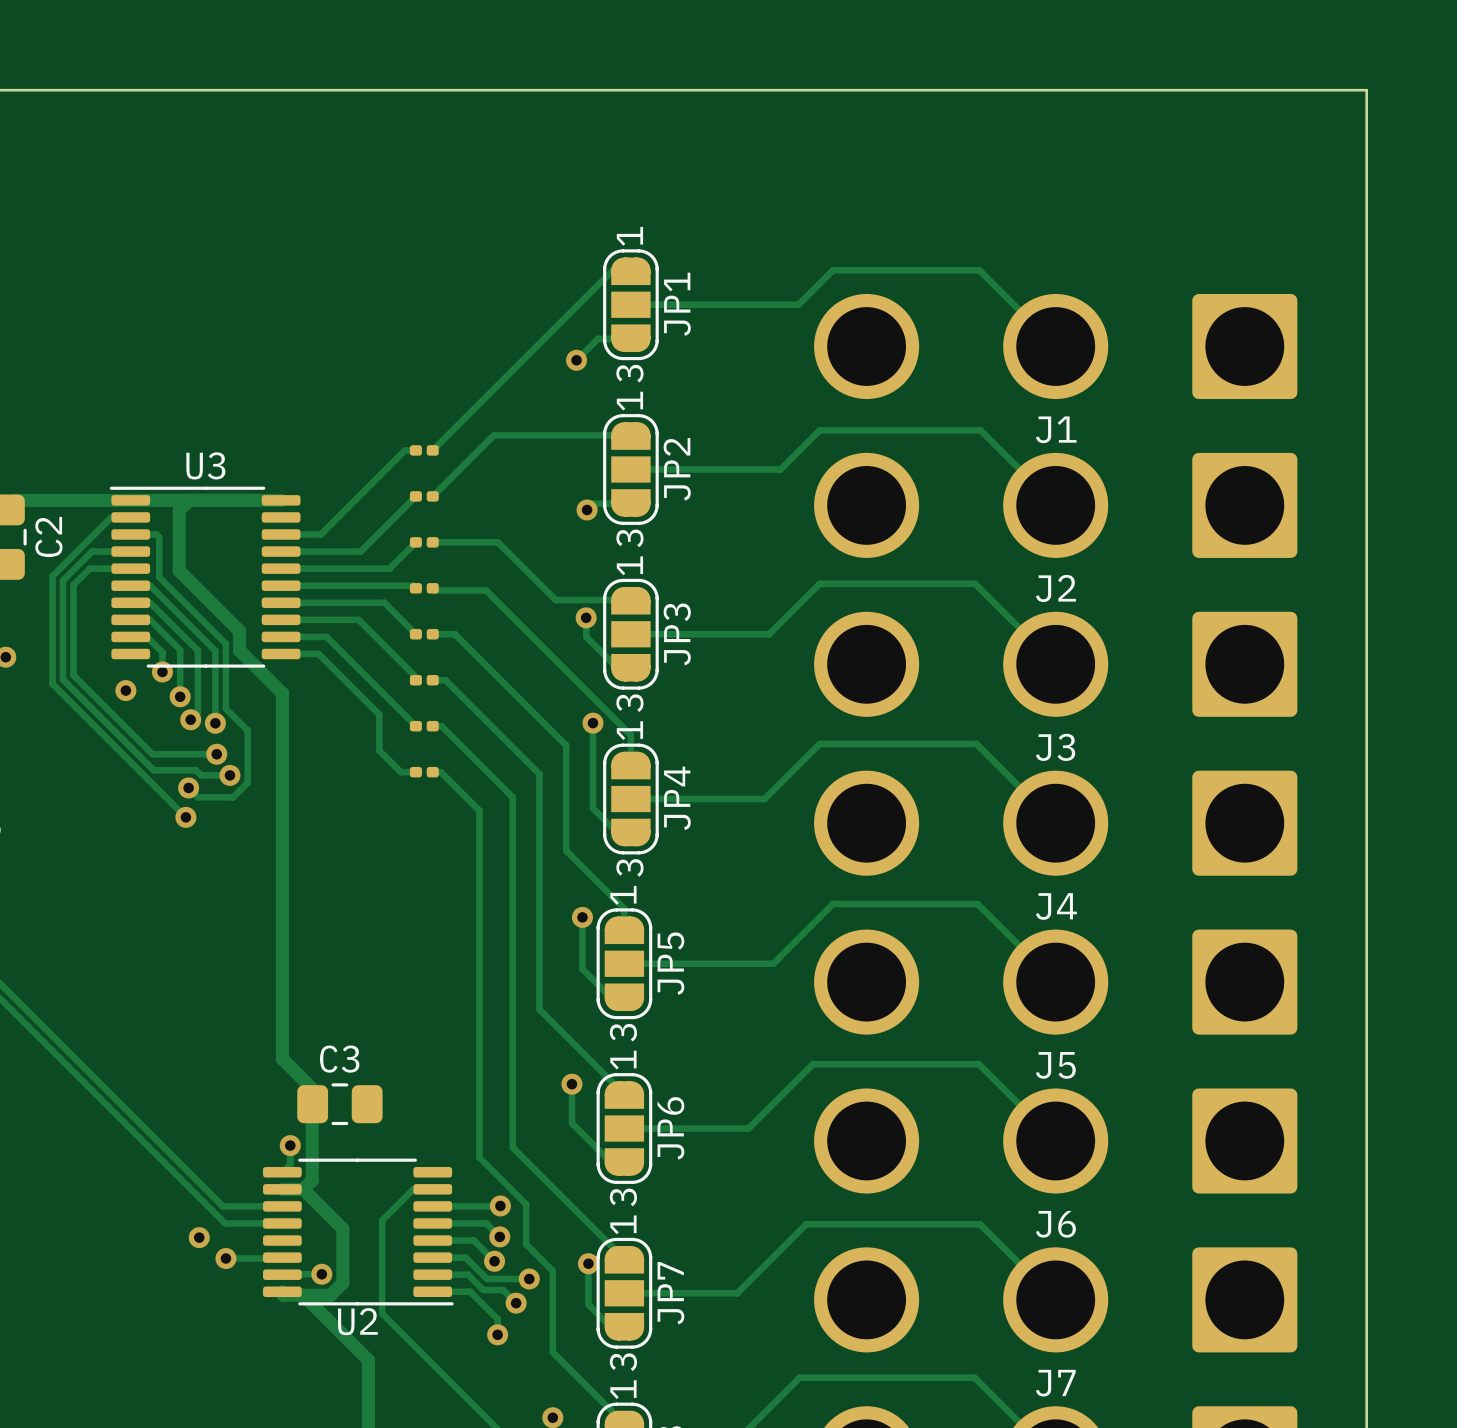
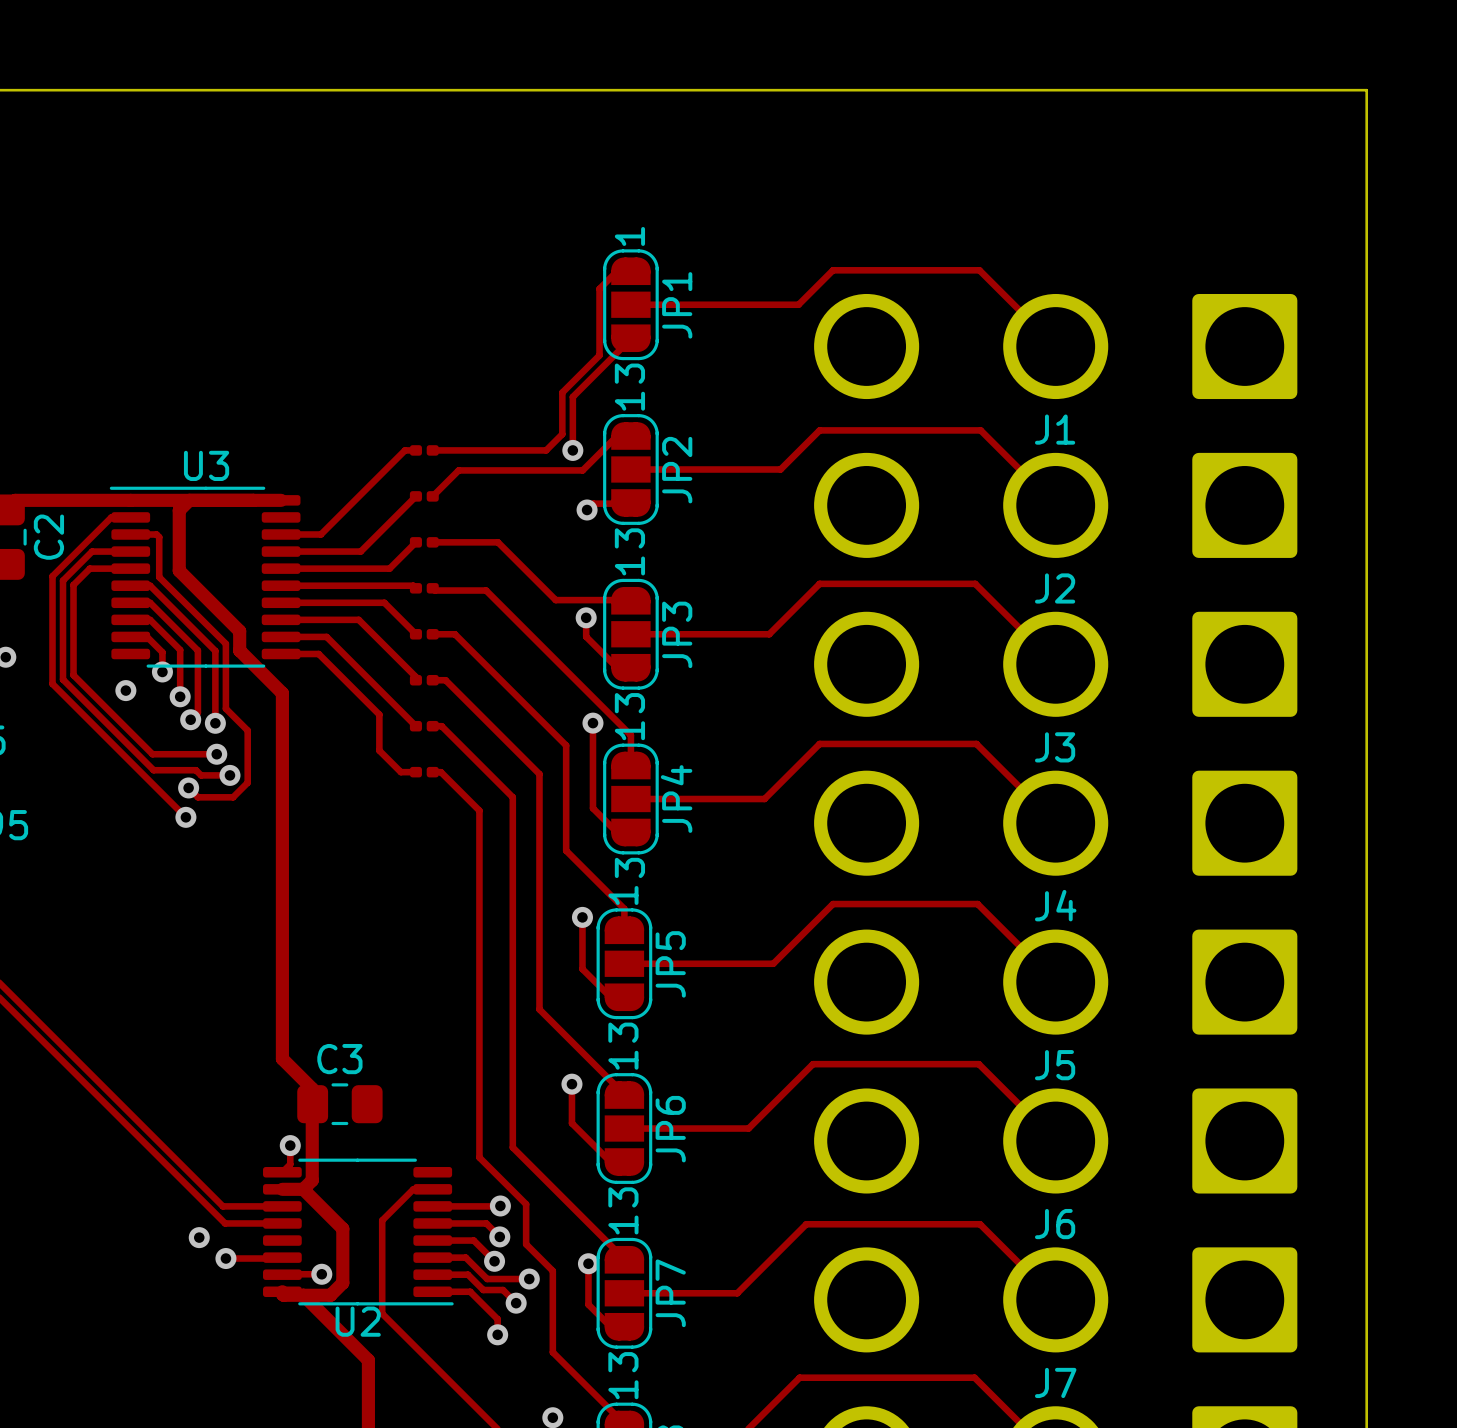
track: (617, 270) (612, 270) (432, 450) -> (617, 270) (599, 288) (599, 355) (562, 392) (562, 434) (546, 450) (432, 450)
track: (630, 338) (597, 338) (576, 360) -> (630, 338) (572, 396) (572, 450)
via position: (576, 360) -> (572, 450)
track: (617, 435) (493, 435) (458, 470) -> (617, 435) (582, 470) (458, 470)

